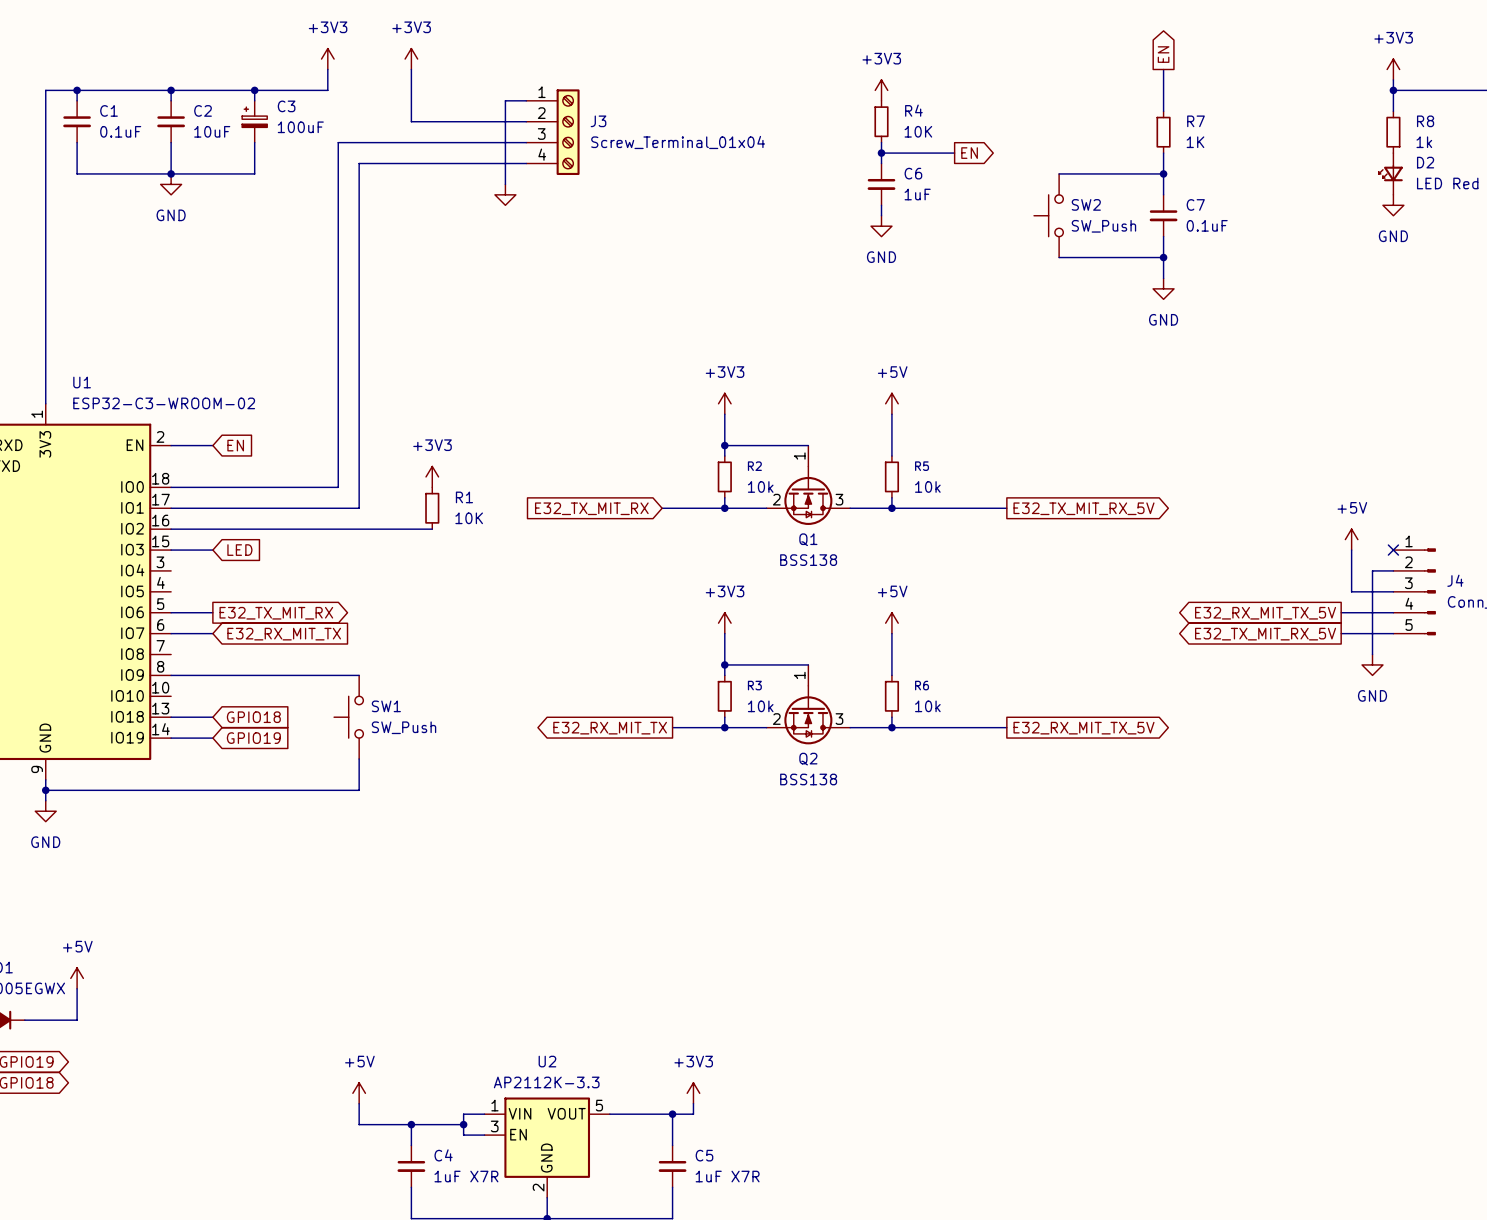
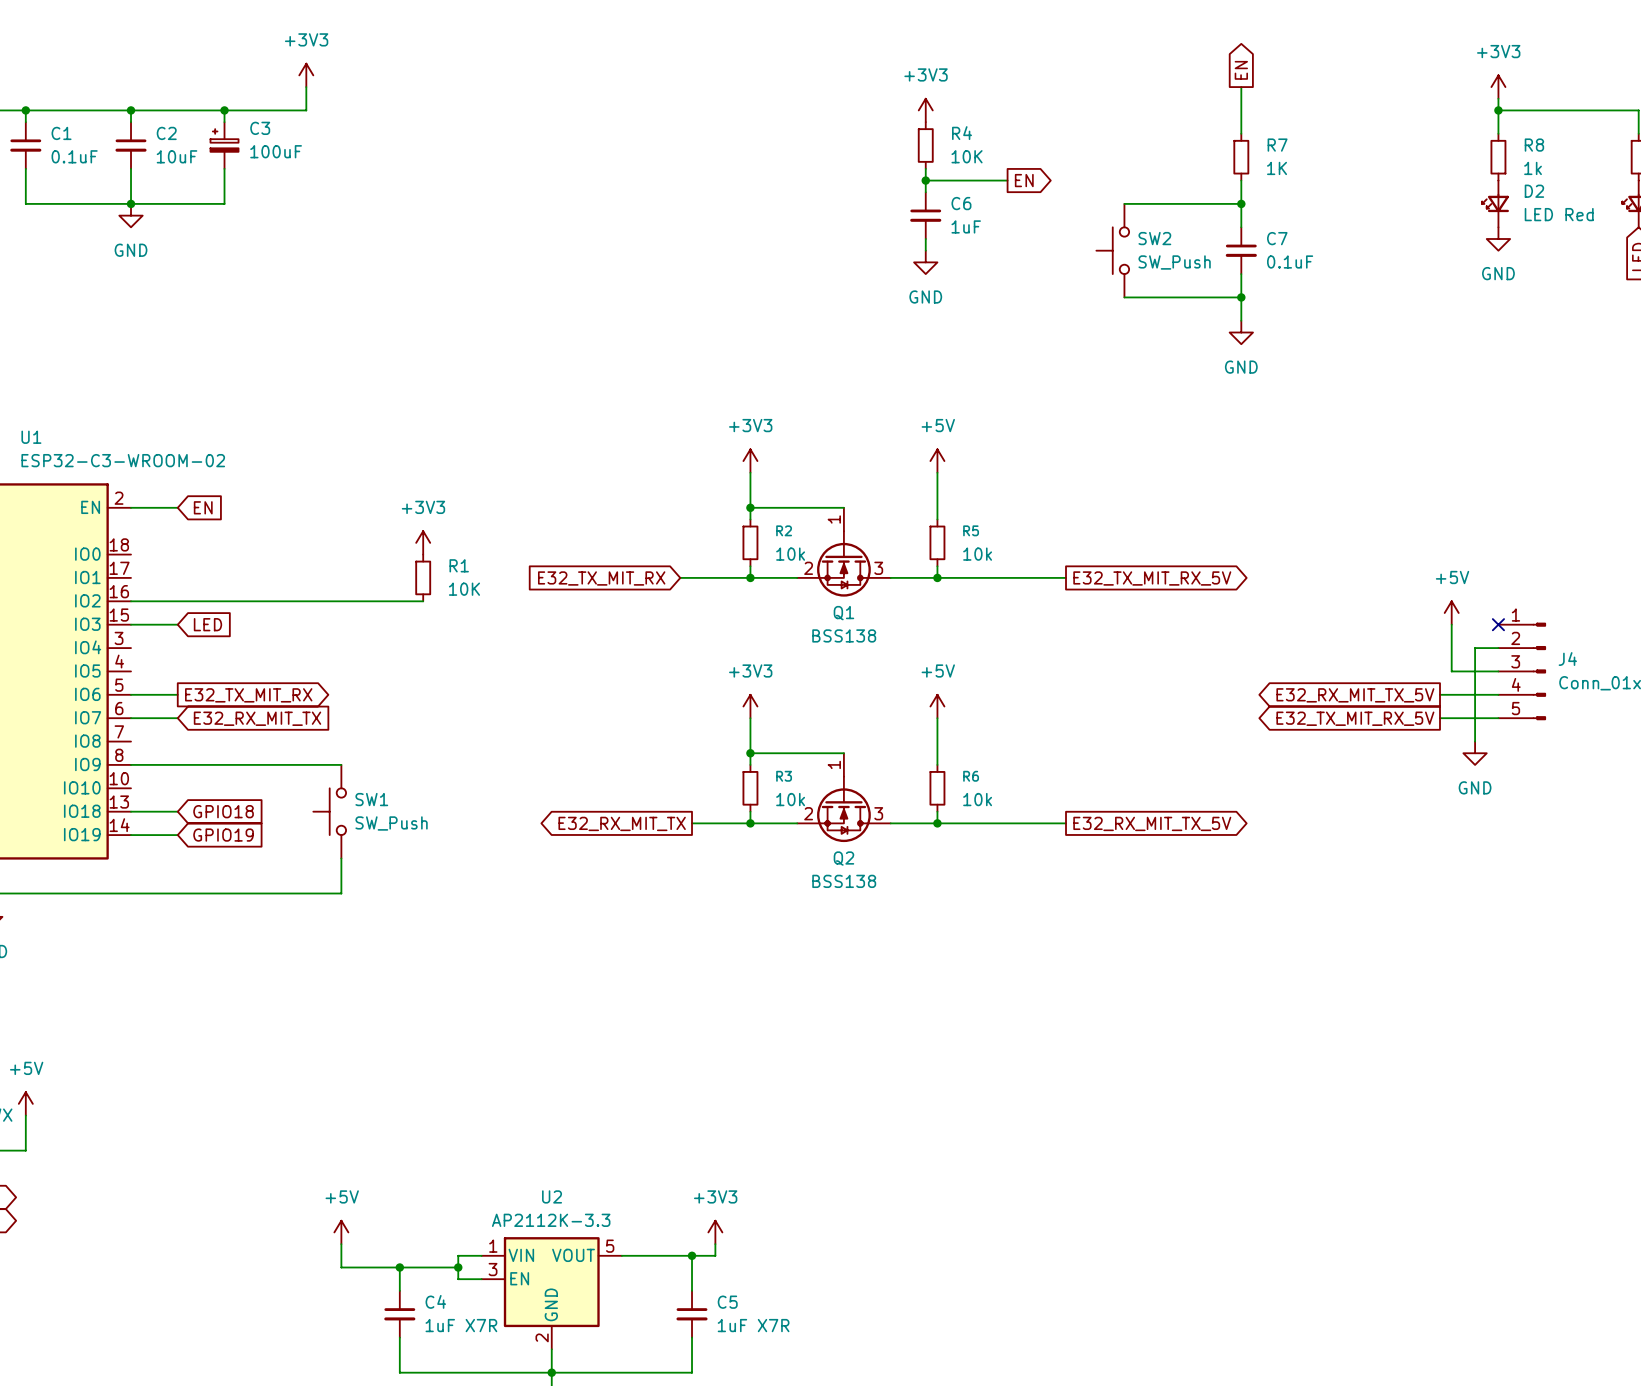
power symbol: +3V3 (411, 59) -> none
wire: (411, 69) (411, 121) (526, 121) -> none
wire: (526, 100) (505, 100) (505, 184) -> none
J3: Screw_Terminal_01x04 (552, 132) -> none
wire: (526, 142) (338, 142) (338, 487) (171, 487) -> none
wire: (526, 163) (359, 163) (359, 508) (171, 508) -> none
power symbol: (505, 194) -> none

